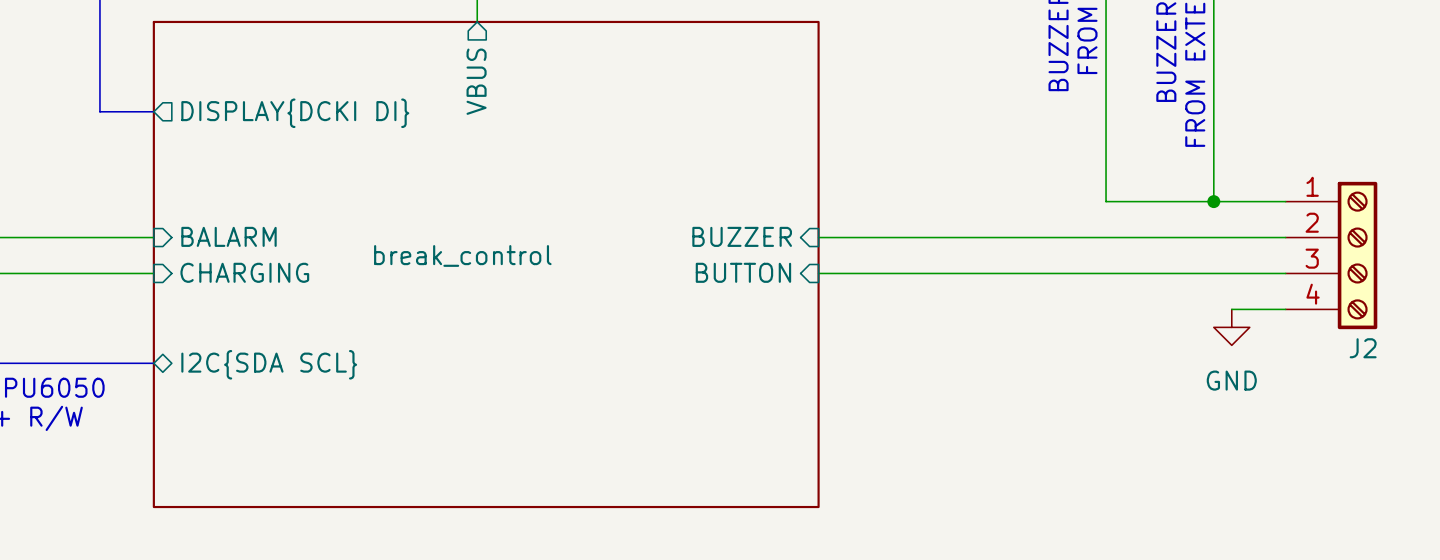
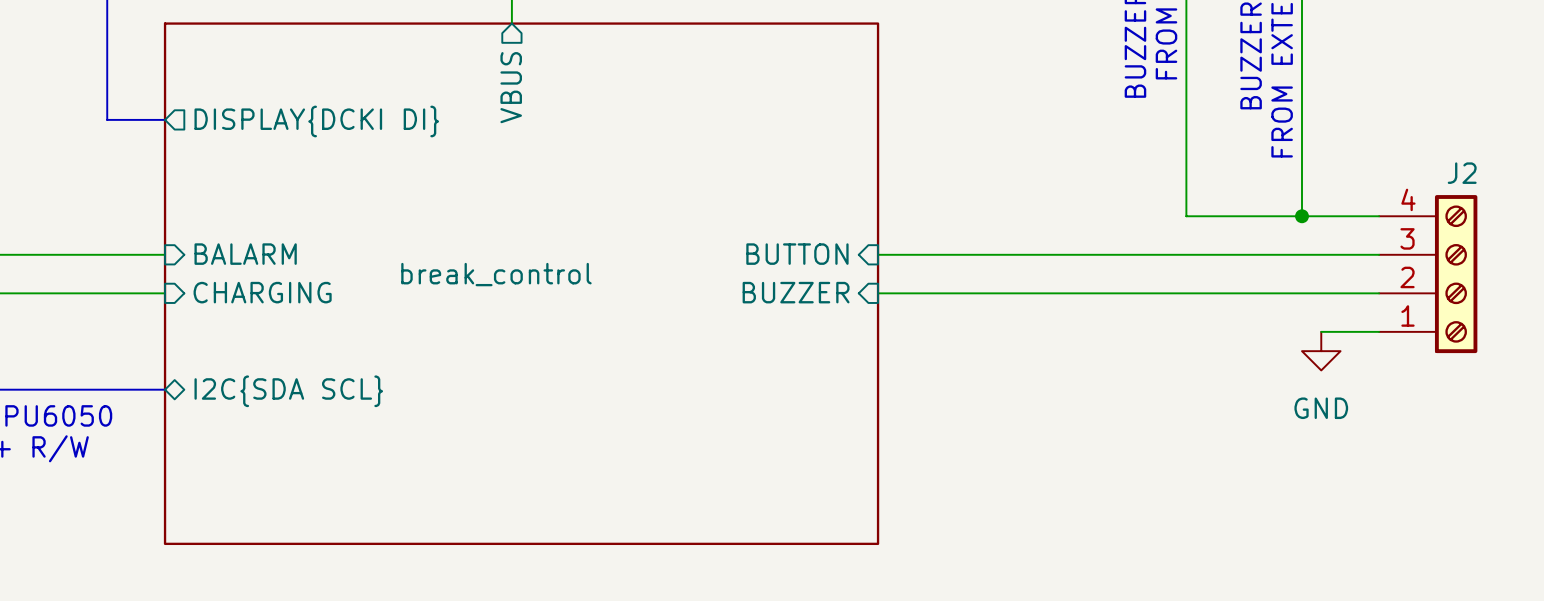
sheet pin: BUZZER (742, 236) -> BUTTON (797, 254)
J2 flip: as is (1357, 255) -> up-down (1456, 274)
sheet pin: BUTTON (743, 272) -> BUZZER (796, 292)

